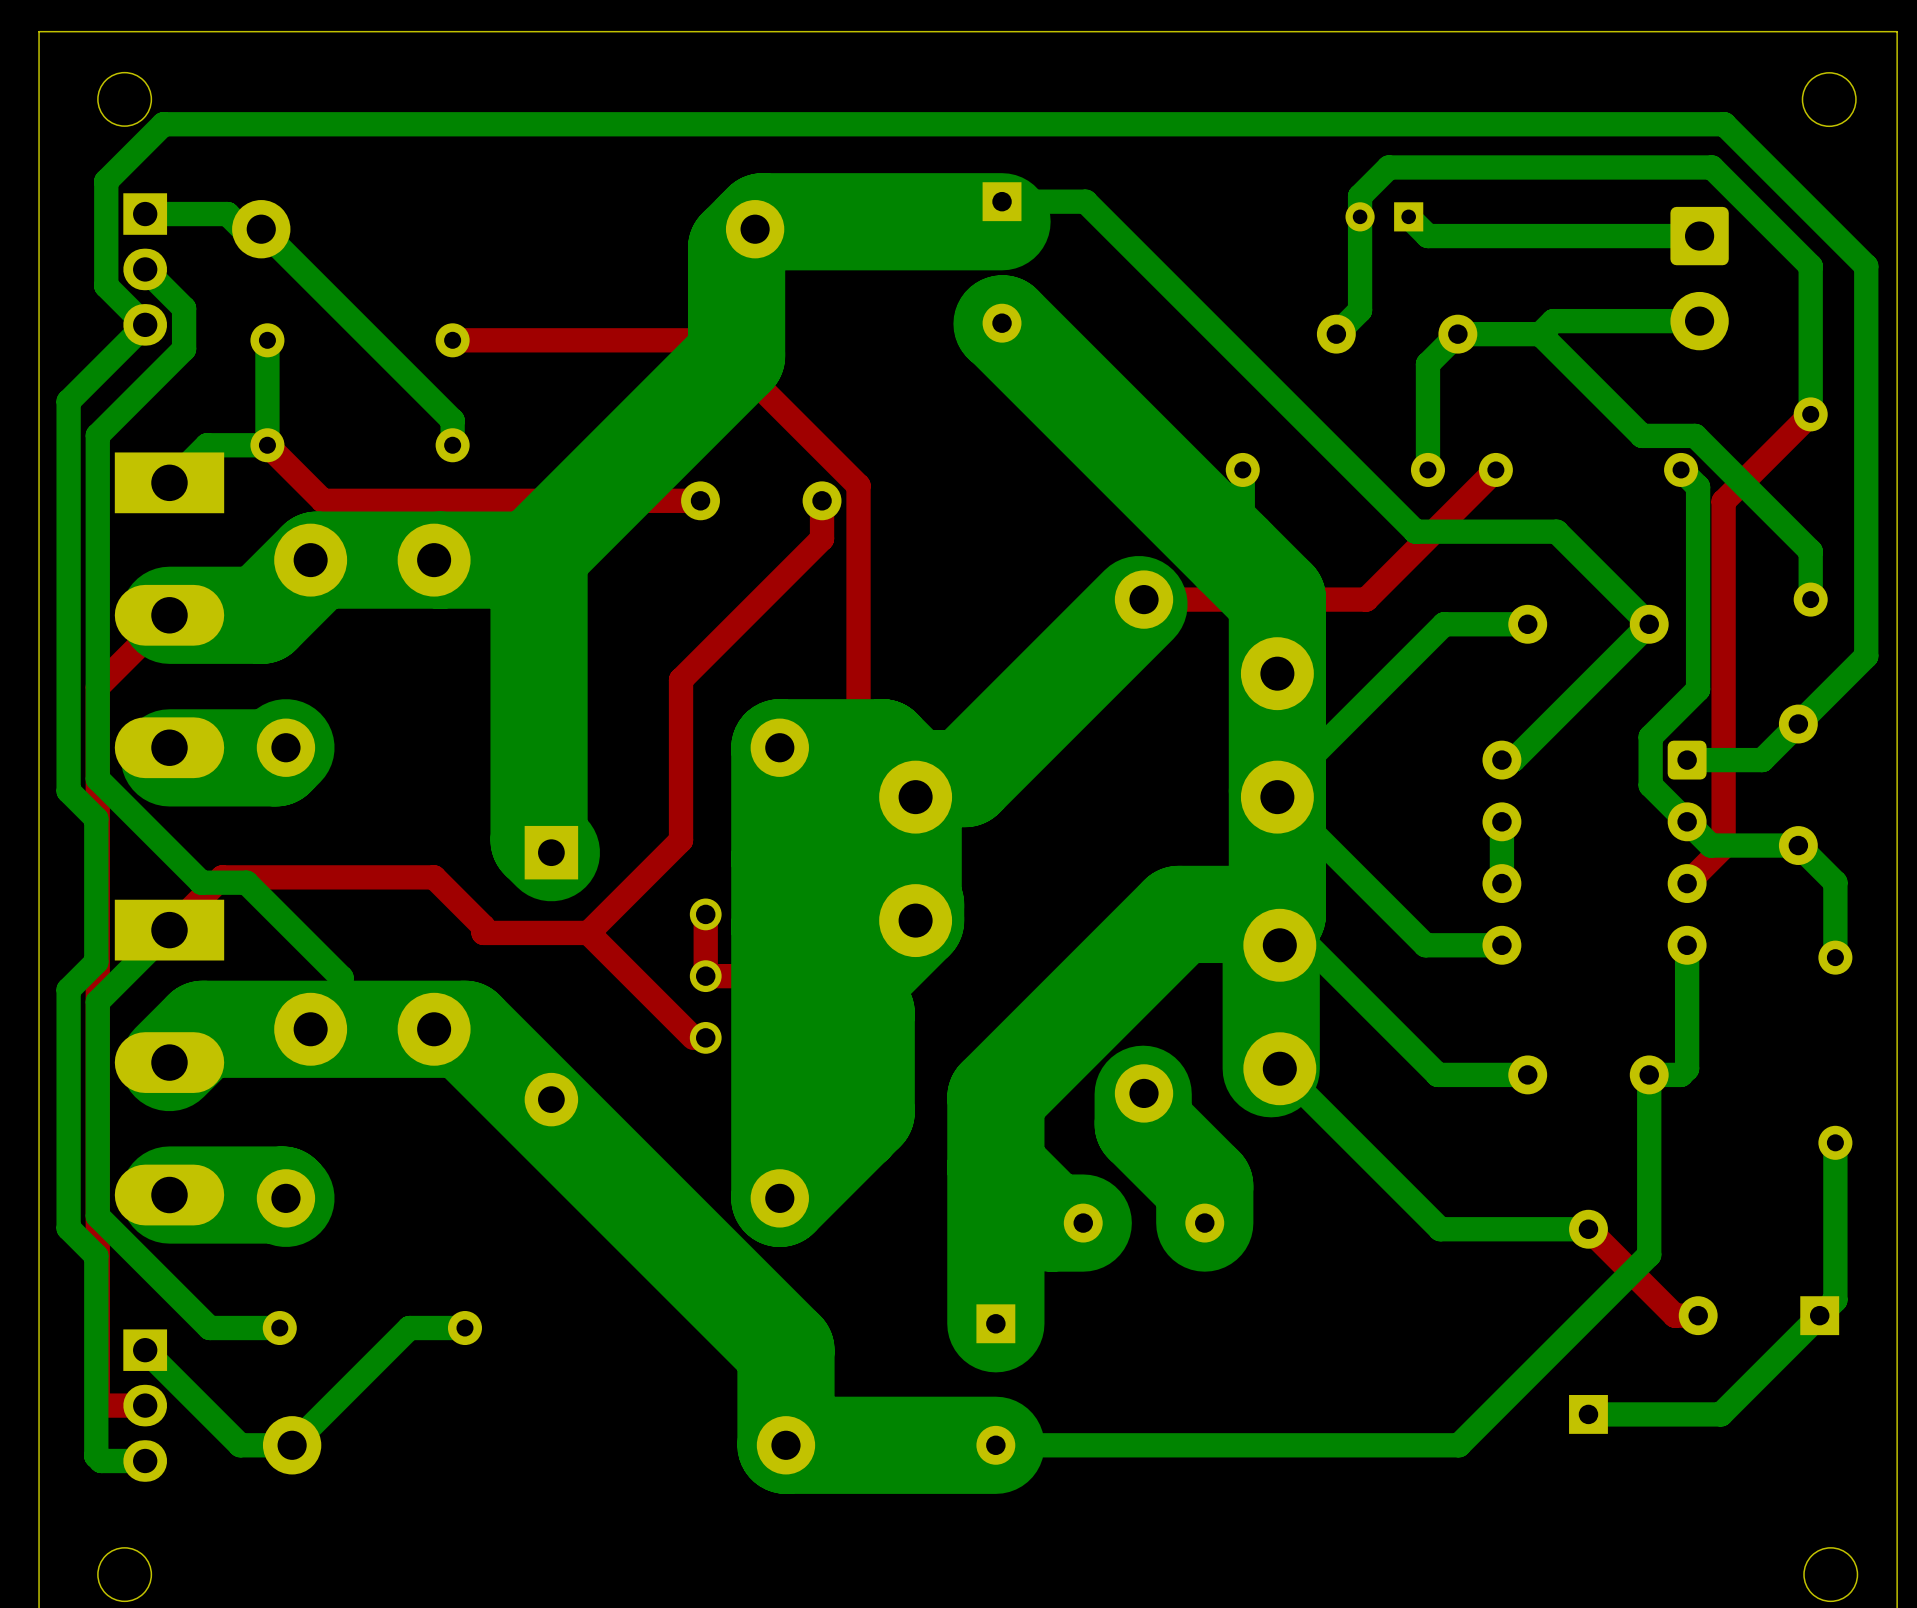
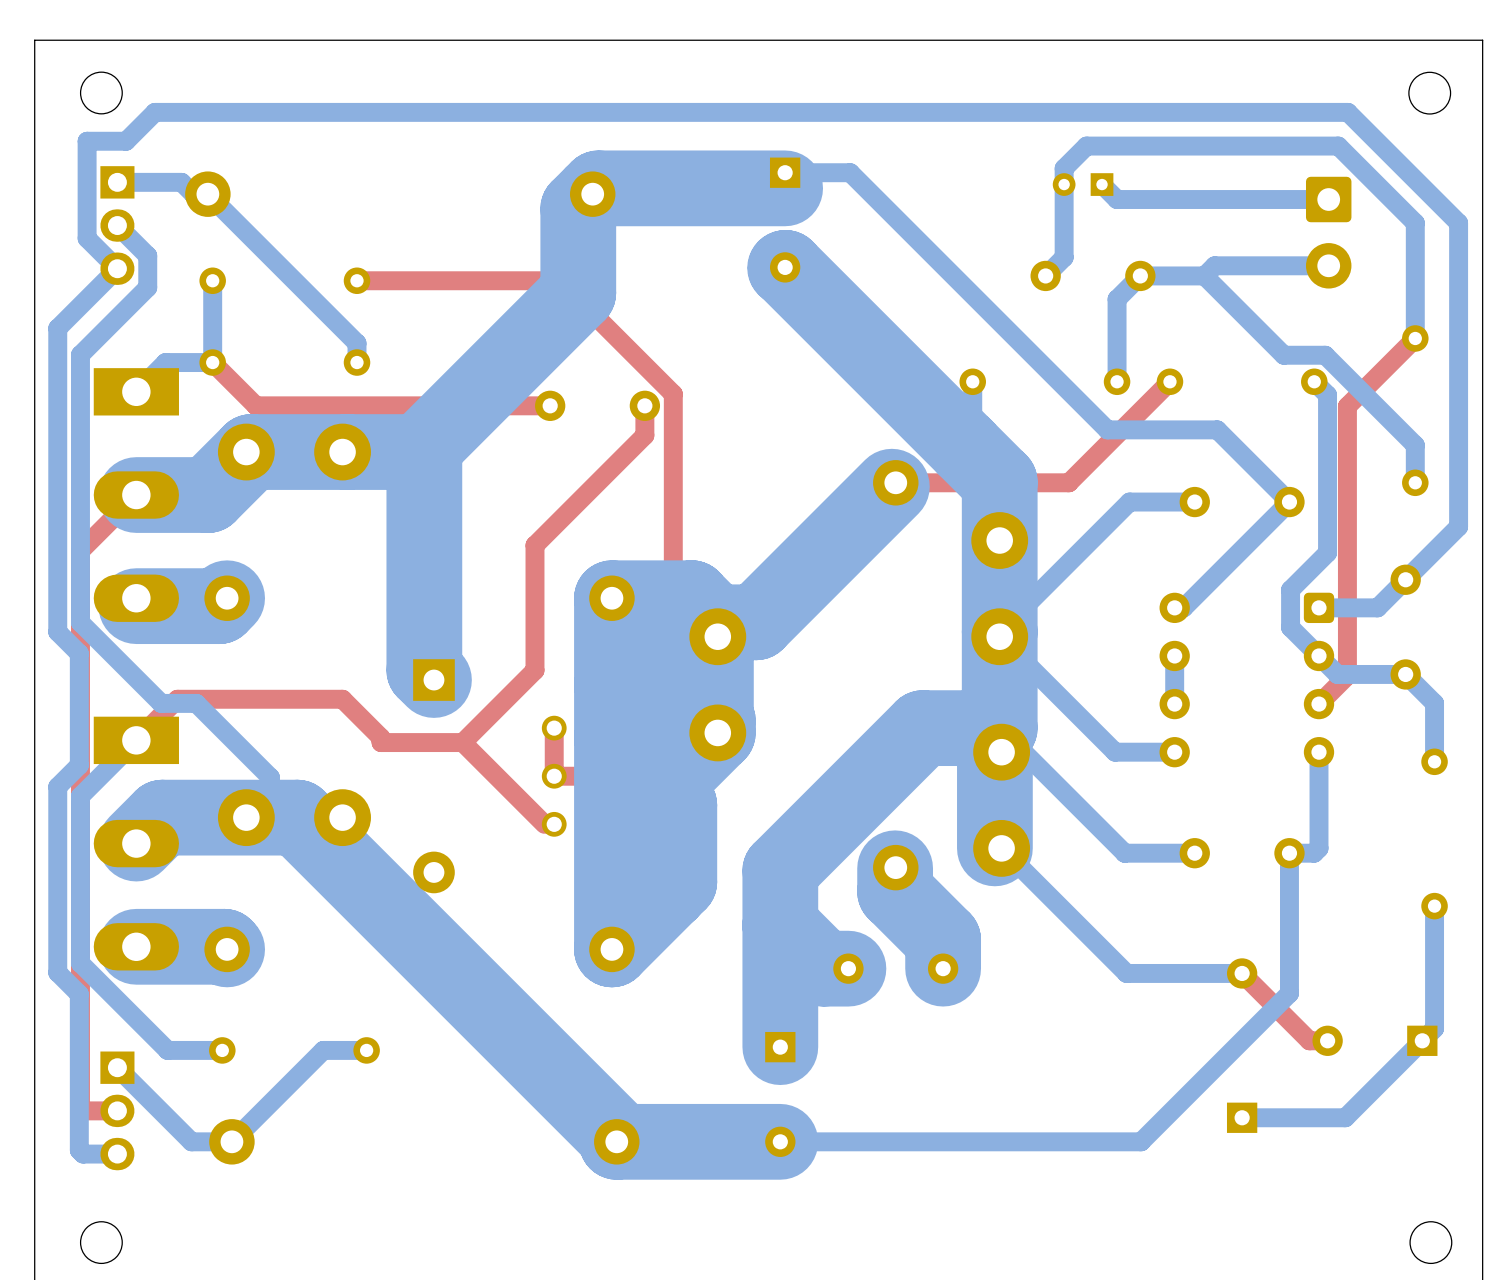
bottom track: (193, 124) (163, 124) (106, 181) -> (154, 112) (126, 141) (87, 141) (87, 156)
bottom track: (376, 1029) (464, 1029) (785, 1350) (785, 1439) -> (297, 817) (616, 1137)

